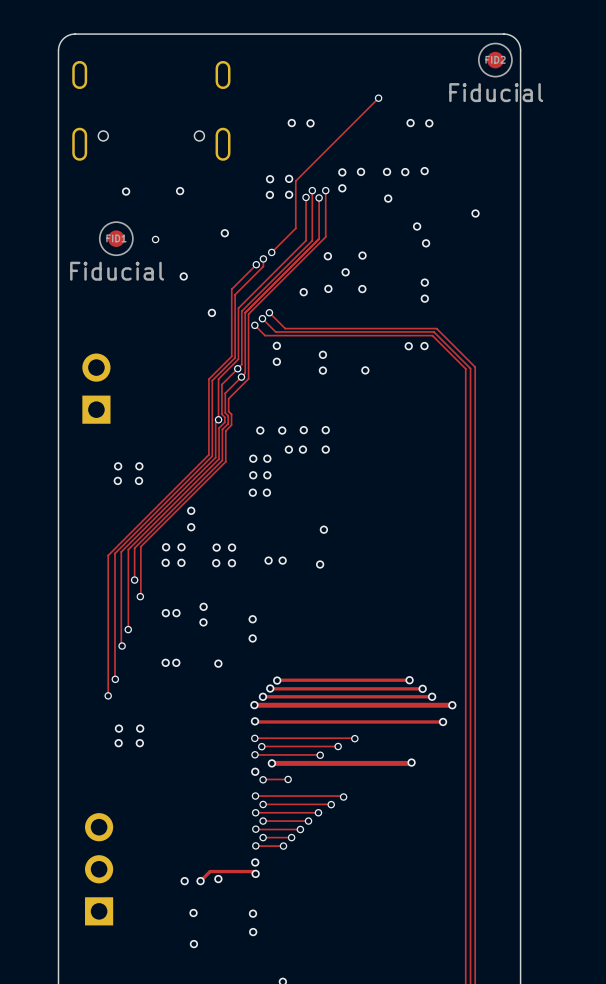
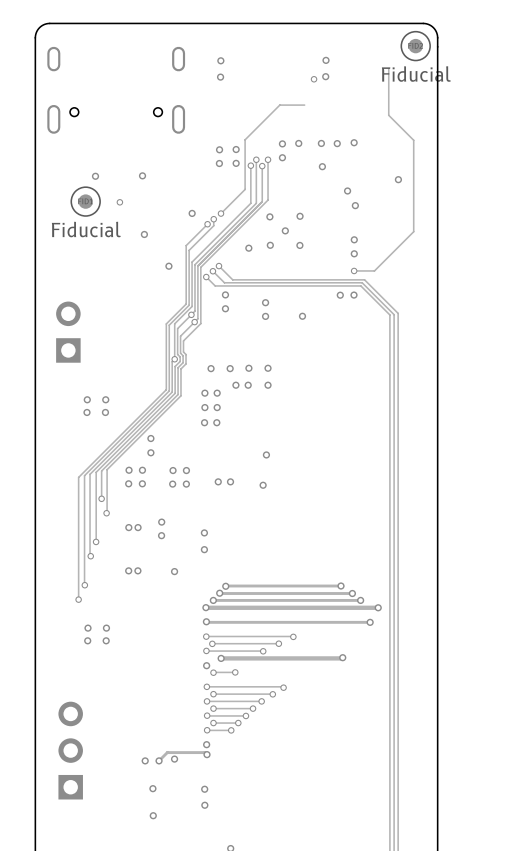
via: none -> (220, 60)
via: none -> (326, 60)
track: none -> (388, 68) (388, 115) (413, 140) (413, 231) (374, 270) (354, 270)
via: none -> (220, 77)
via: none -> (325, 76)
track: (377, 98) (295, 180) (295, 228) -> (304, 105) (279, 105) (245, 139) (245, 189) (241, 192)
via: (291, 123) -> none
via: (310, 123) -> none
via: (410, 123) -> none
via: (429, 123) -> none
via position: (126, 191) -> (95, 176)
via position: (180, 191) -> (142, 175)
via position: (224, 233) -> (192, 213)
via: none -> (354, 270)

